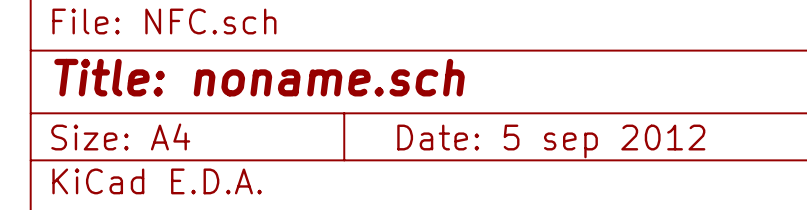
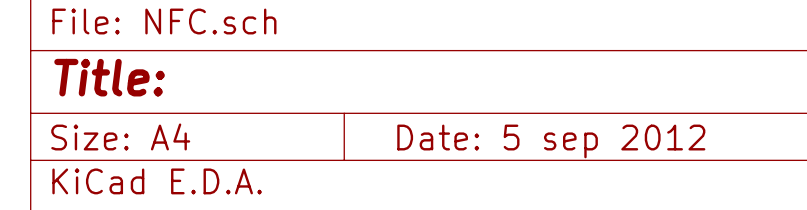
title block: Title: noname.sch (259, 77) -> Title: (109, 77)

